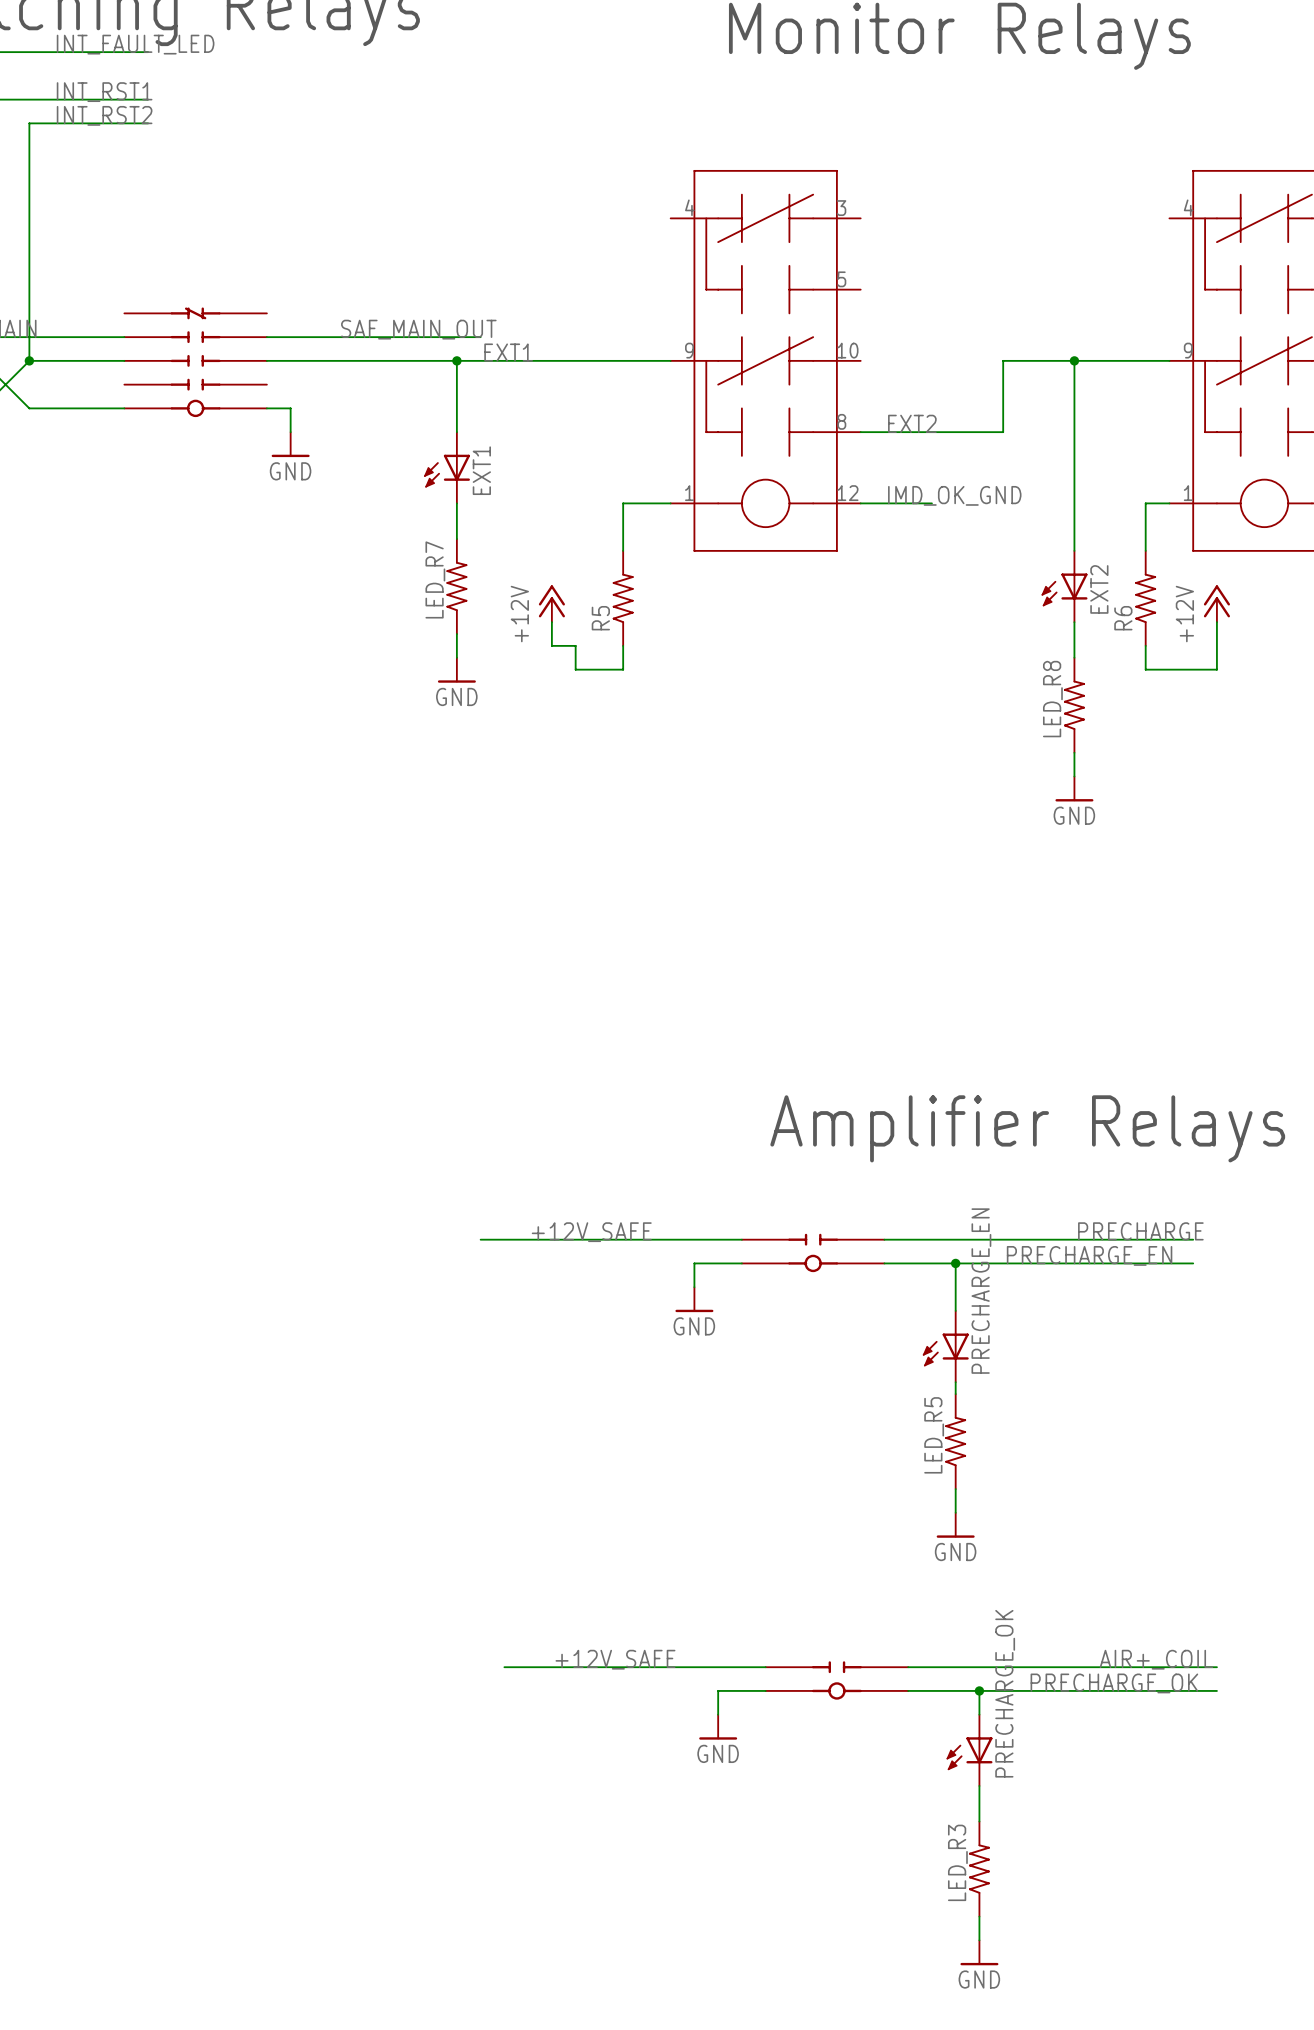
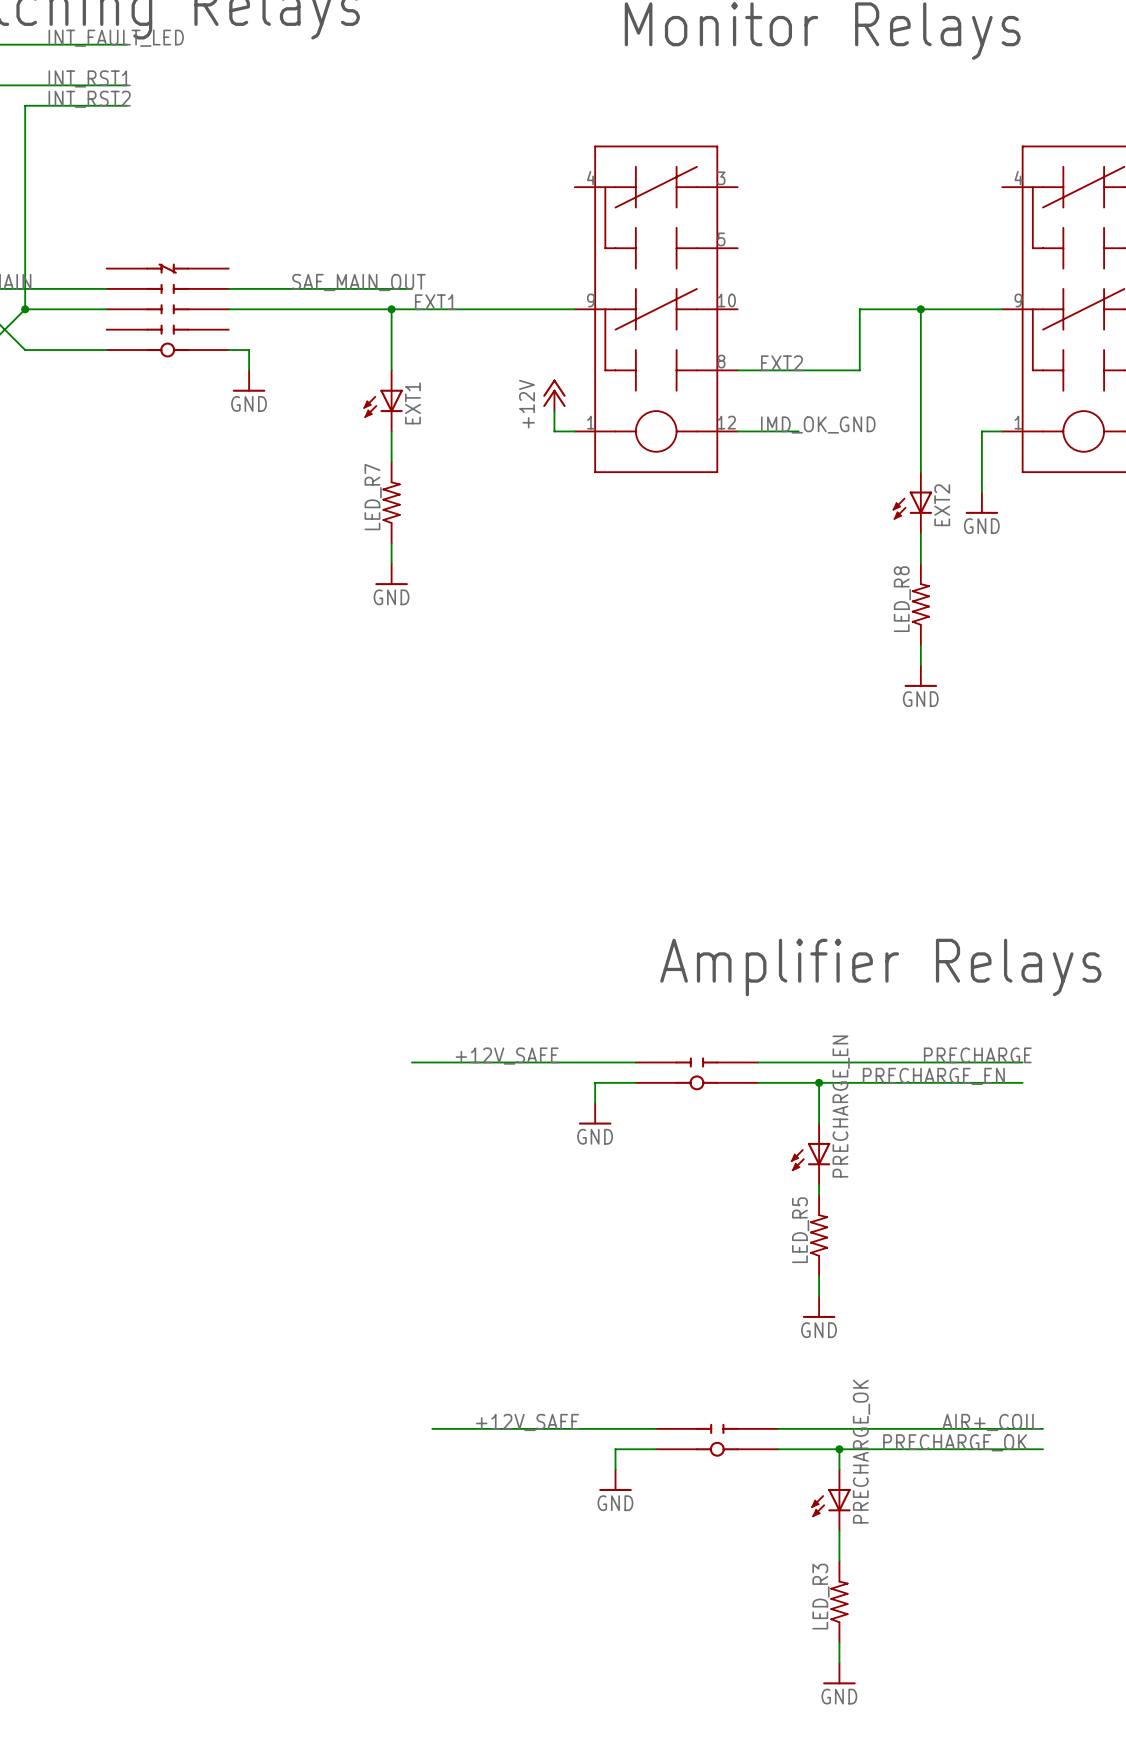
wire: (646, 503) (623, 503) (623, 550) -> (554, 431) (554, 411)
power symbol: none -> GND (981, 503)
R5: (623, 598) -> none
R6: (1145, 598) -> none
power symbol position: +12V (551, 603) -> +12V (554, 395)
power symbol: +12V (1216, 603) -> none
wire: (551, 622) (551, 645) (575, 645) (575, 669) (623, 669) (623, 645) -> none
wire: (1216, 622) (1216, 669) (1145, 669) (1145, 645) -> none

